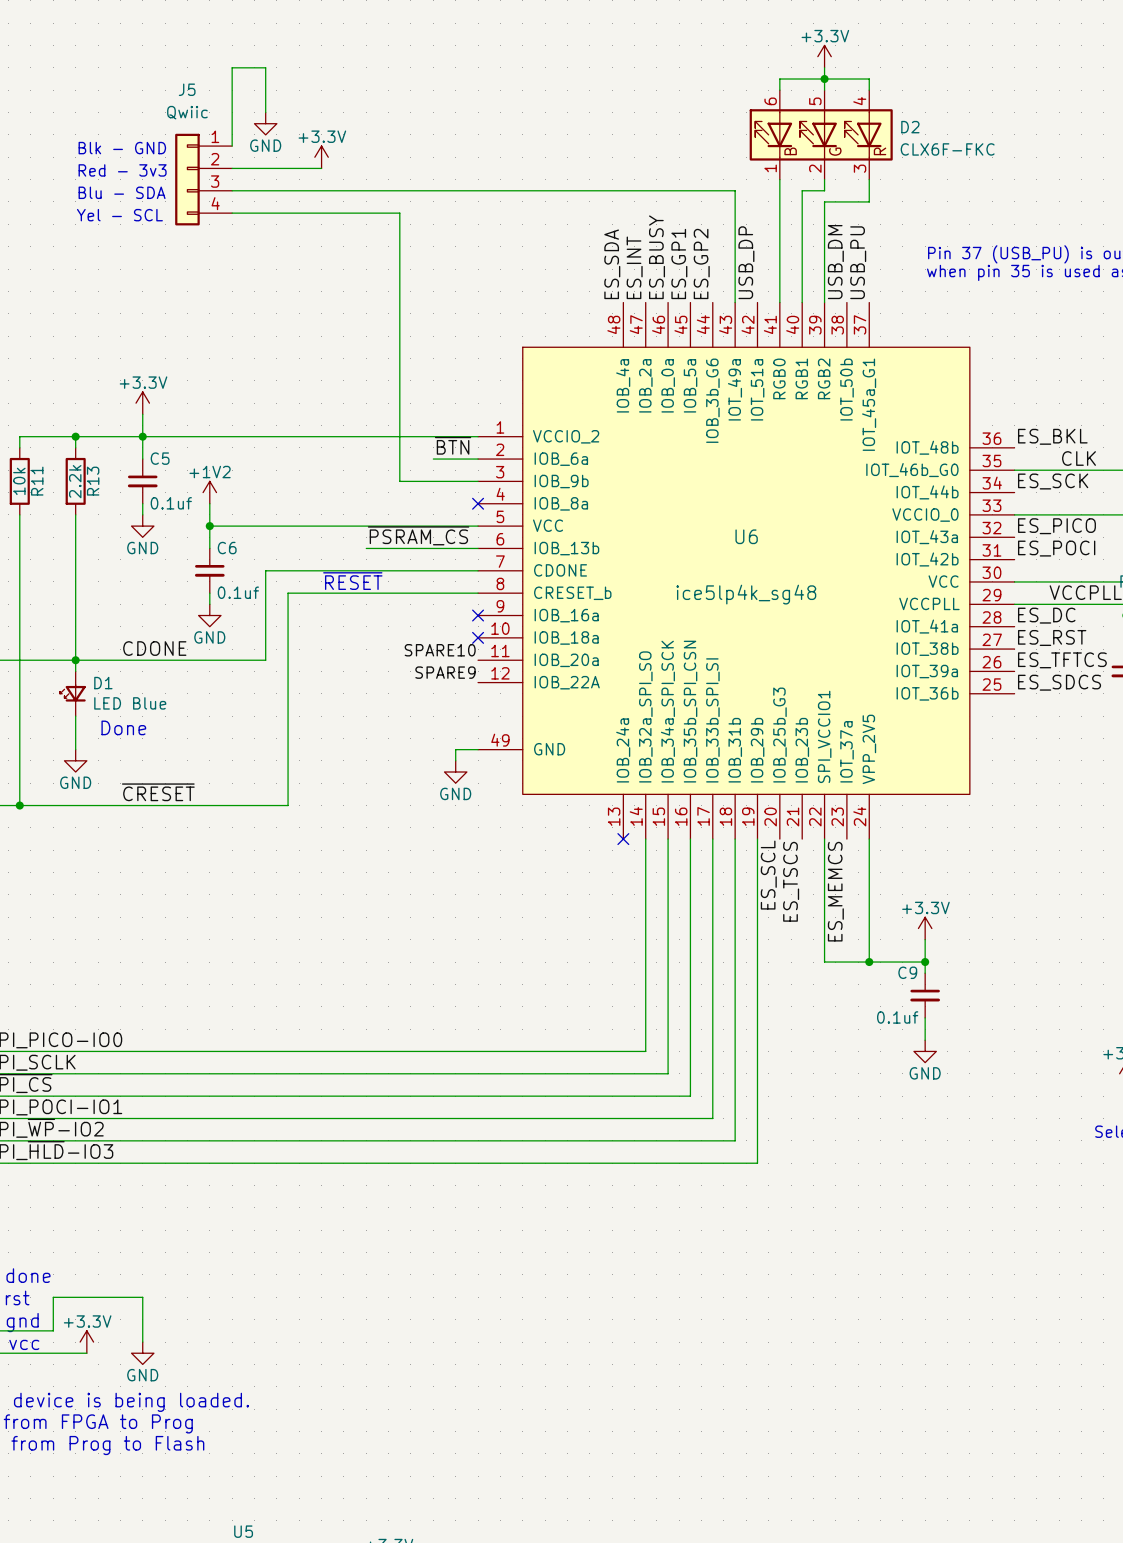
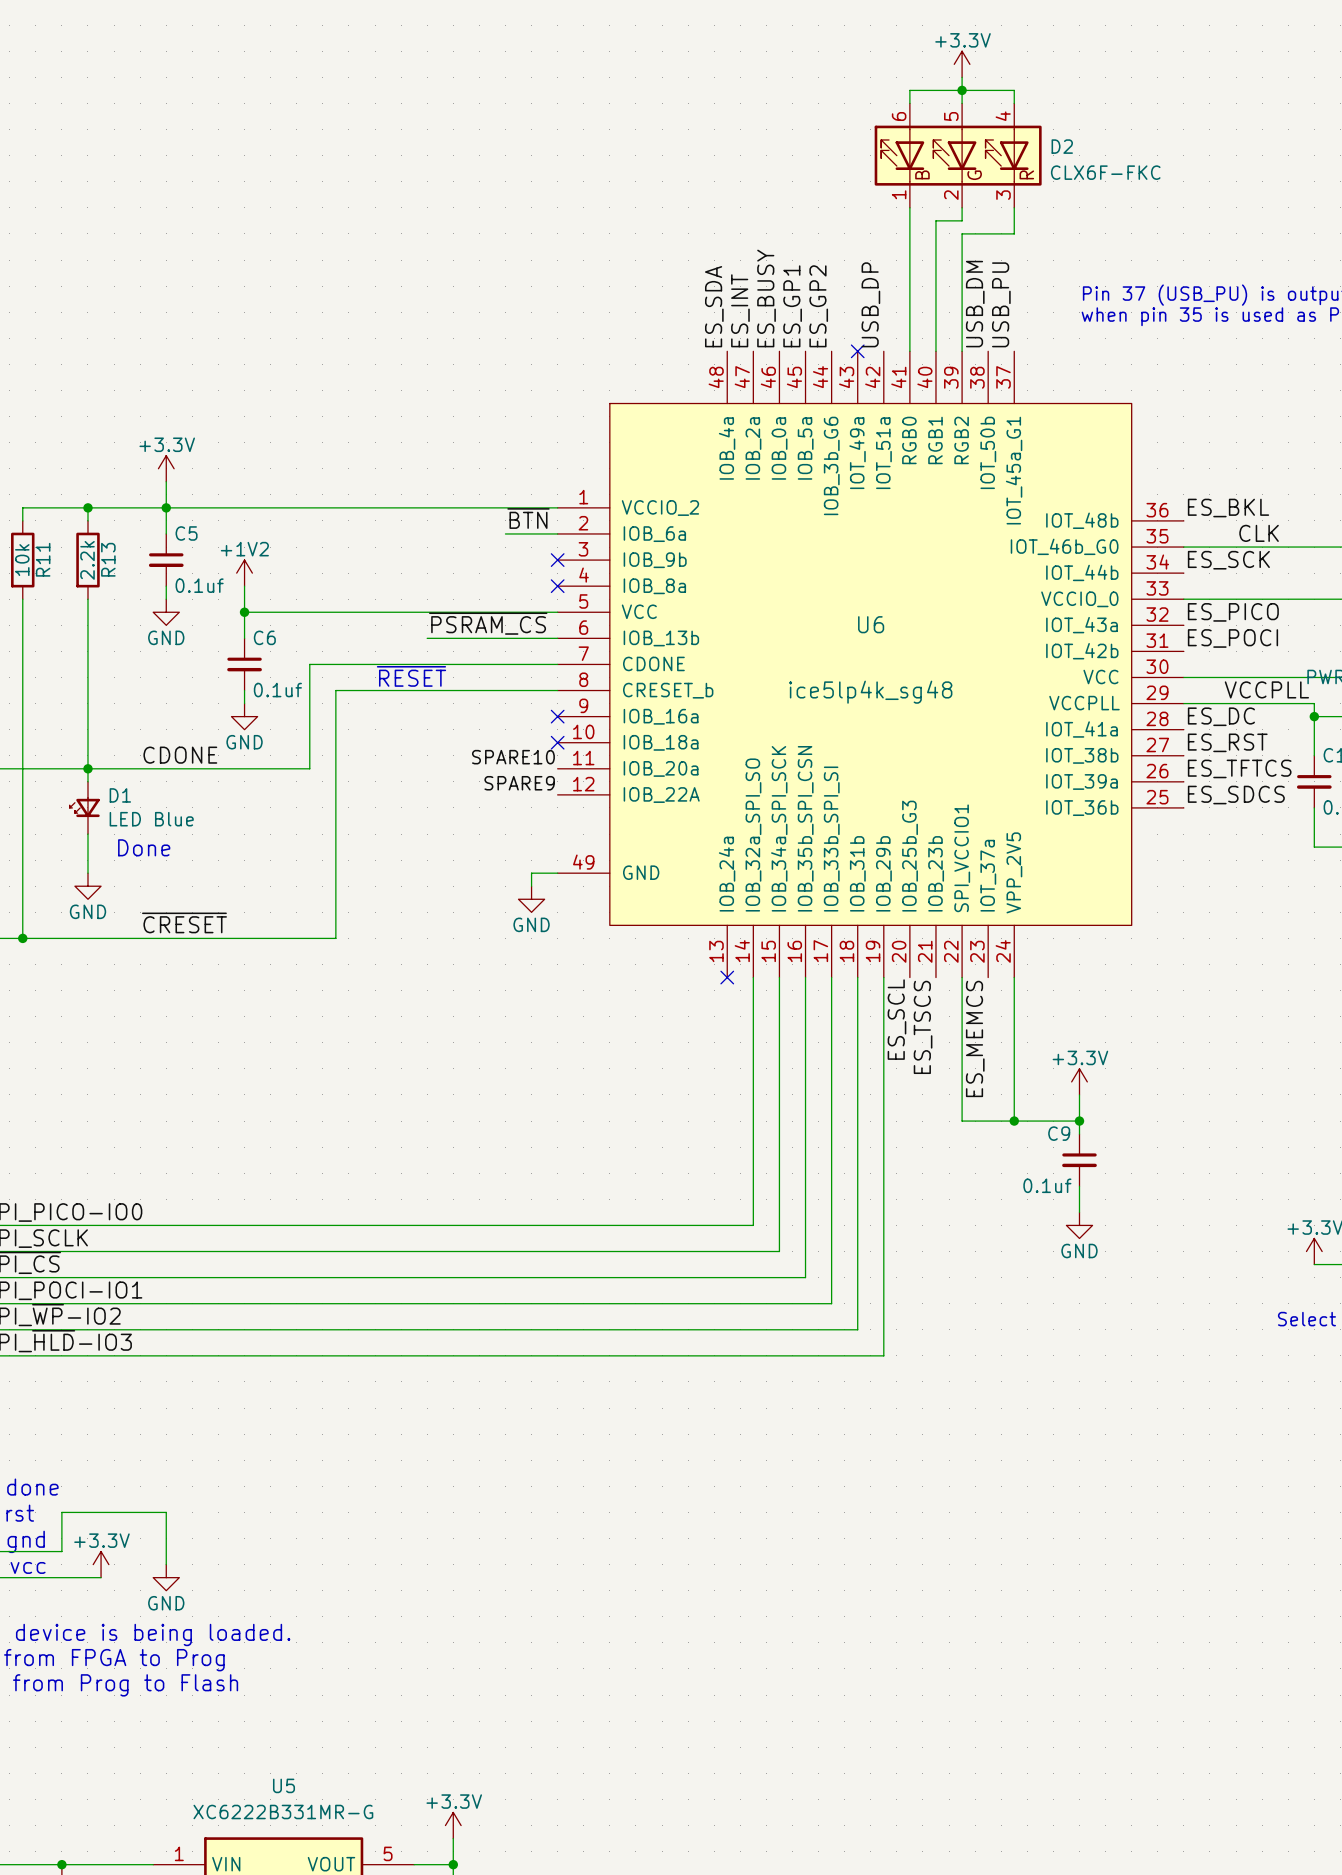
wire: (265, 112) (265, 67) (232, 67) (232, 146) -> none
power symbol: GND (265, 123) -> none
text: Blk - GND (122, 148) -> none
power symbol: +3.3V (321, 157) -> none
wire: (232, 168) (321, 168) -> none
text: Red - 3v3 (122, 170) -> none
J5: Qwiic (203, 179) -> none
wire: (232, 190) (735, 190) (735, 302) -> none
text: Blu - SDA (122, 192) -> none
wire: (232, 213) (399, 213) (399, 481) (478, 481) -> none
text: Yel - SCL (119, 215) -> none
no-connect mark: none -> (857, 351)
no-connect mark: none -> (557, 560)

